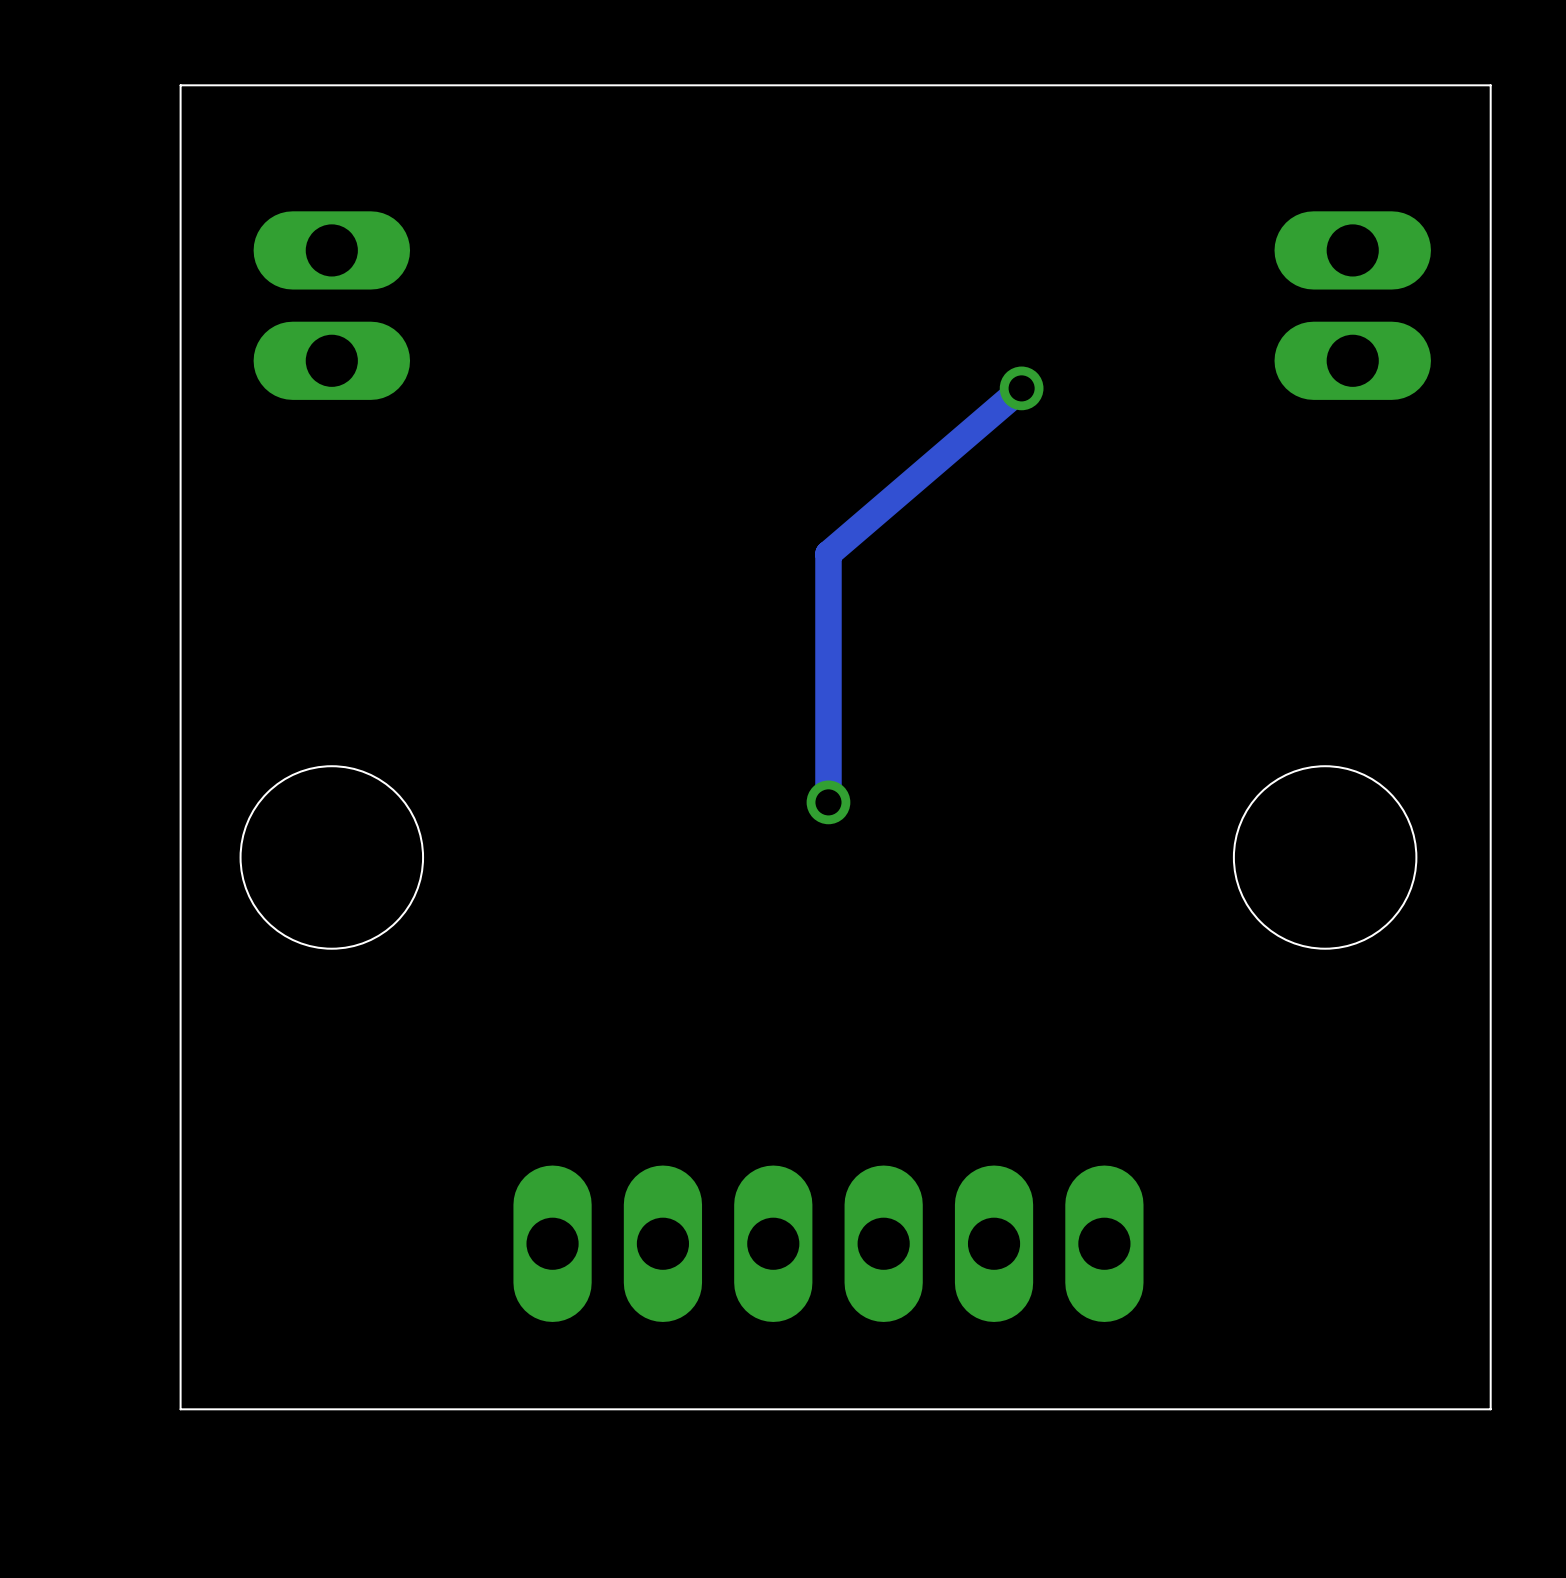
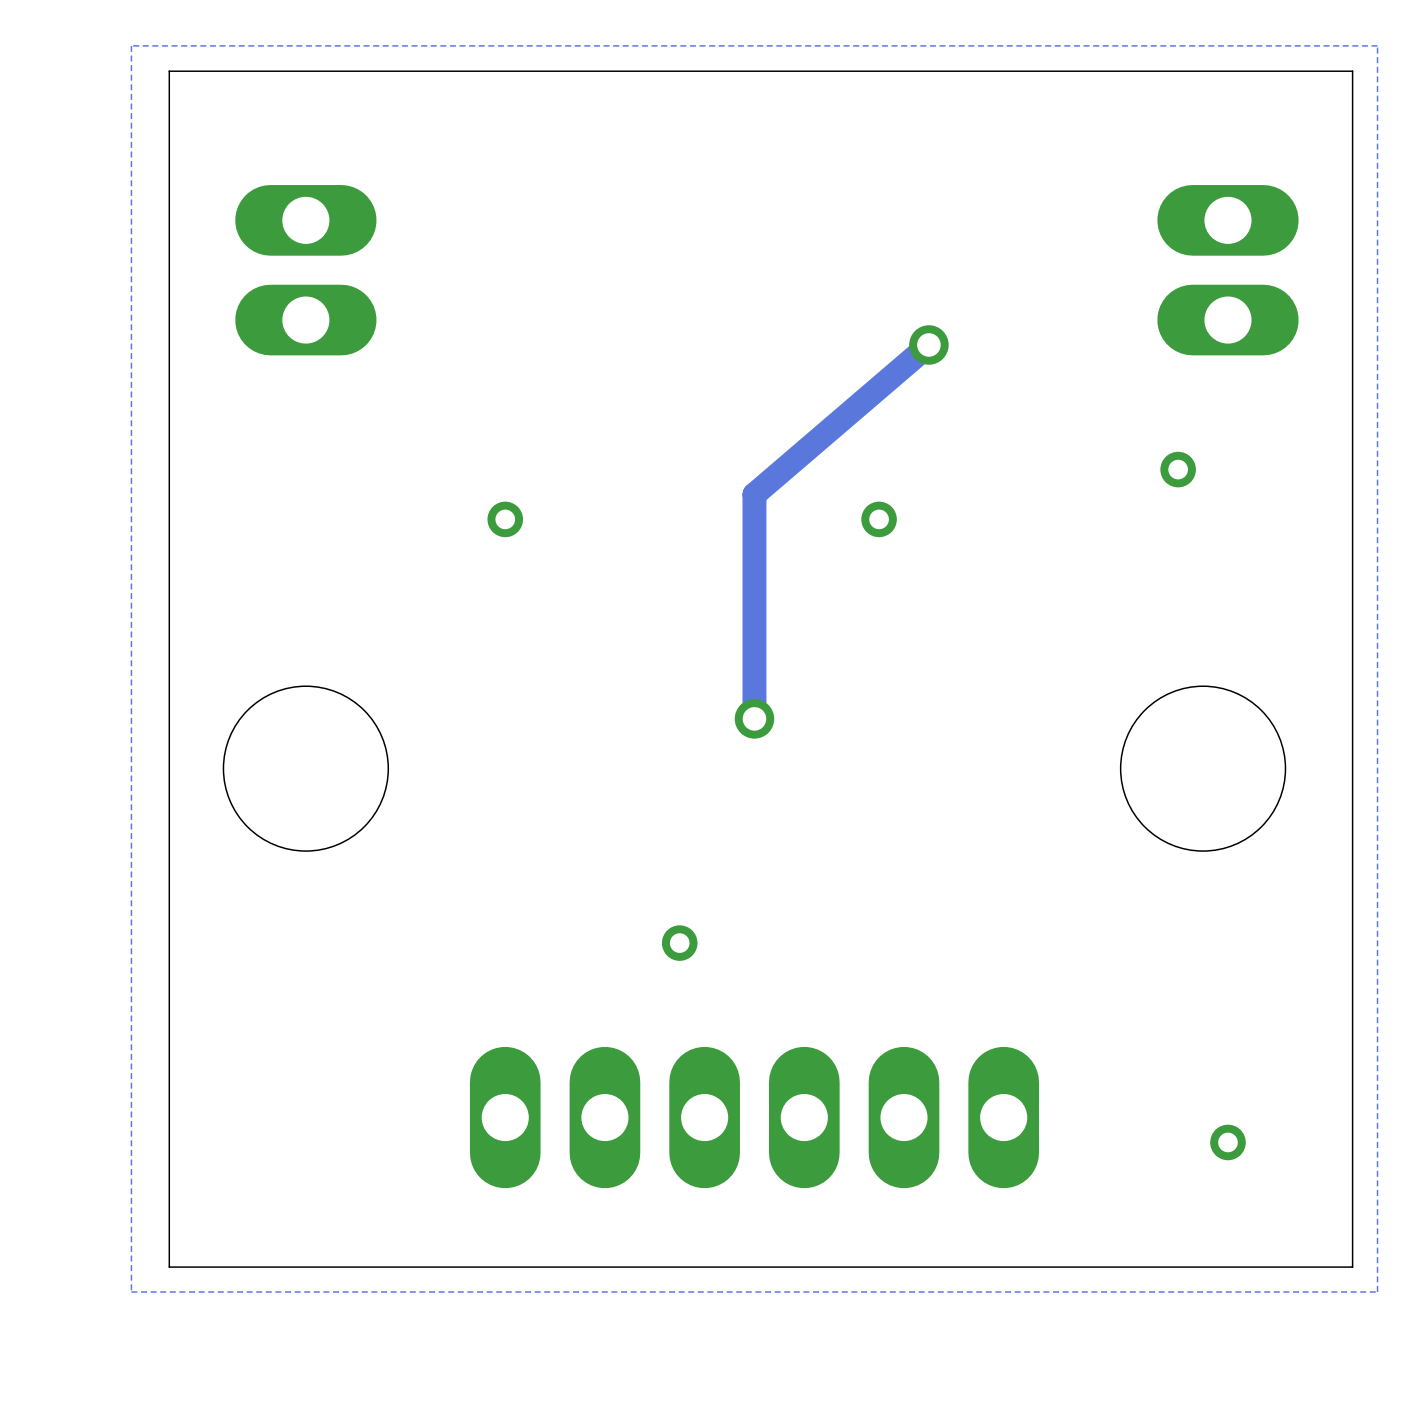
zone outline: none -> (1377, 45) (131, 45) (131, 1292) (1377, 1292) (1377, 45)
via: none -> (1178, 469)
via: none -> (505, 519)
via: none -> (879, 519)
via: none -> (679, 943)
via: none -> (1227, 1142)

